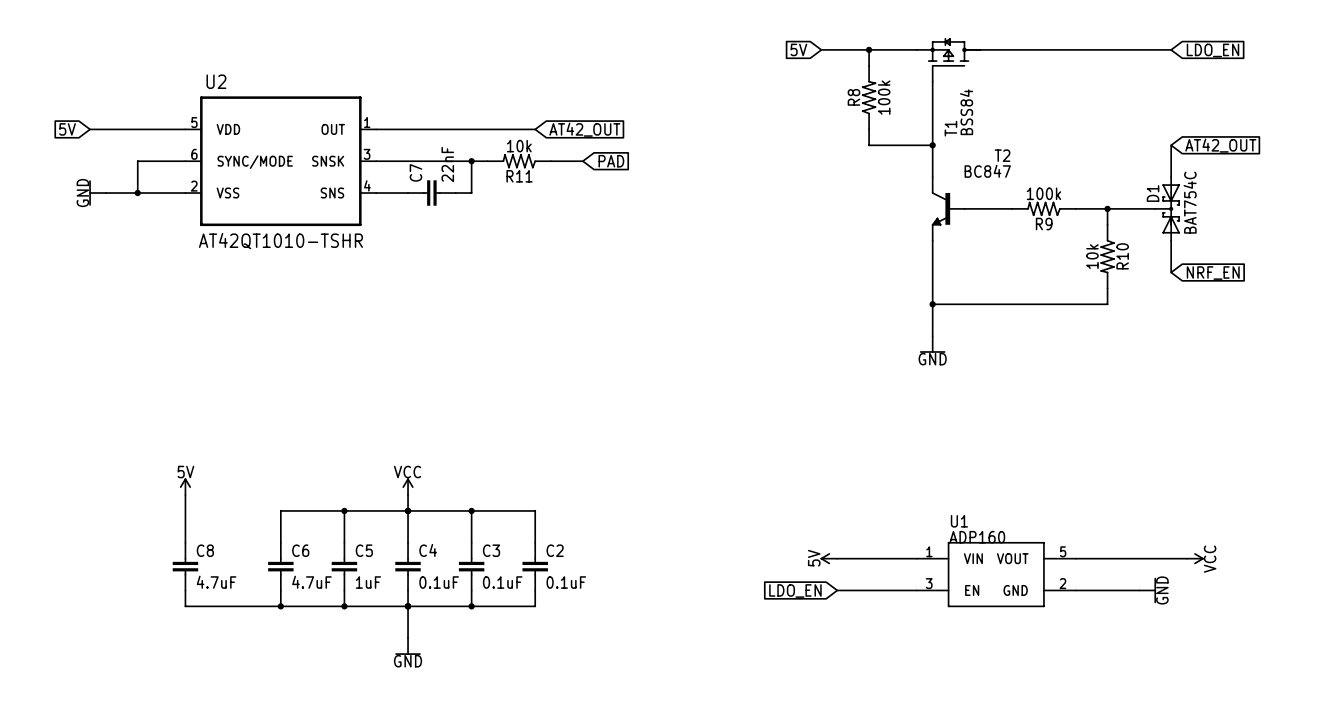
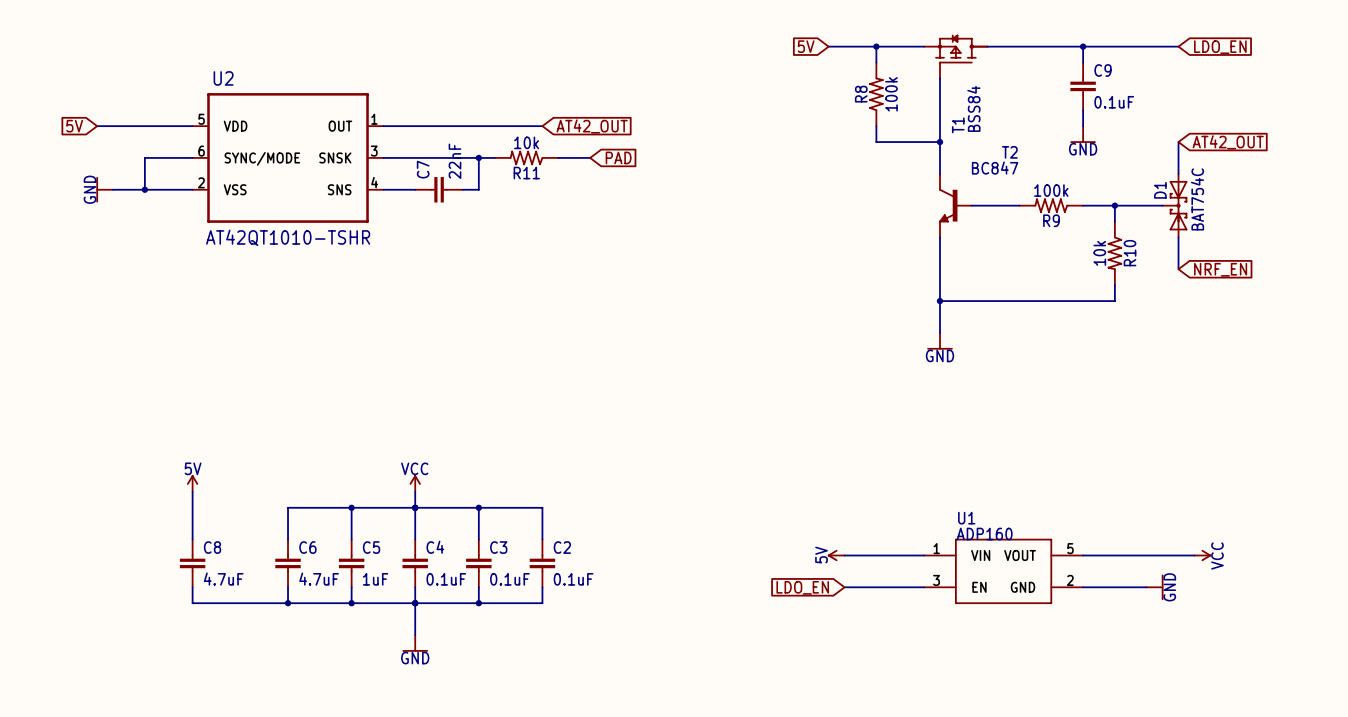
wire: none -> (1083, 46) (1083, 62)
junction: none -> (1083, 46)
C9: none -> 0.1uF (1083, 86)
wire: none -> (1083, 110) (1083, 126)
power symbol: none -> GND (1083, 134)

